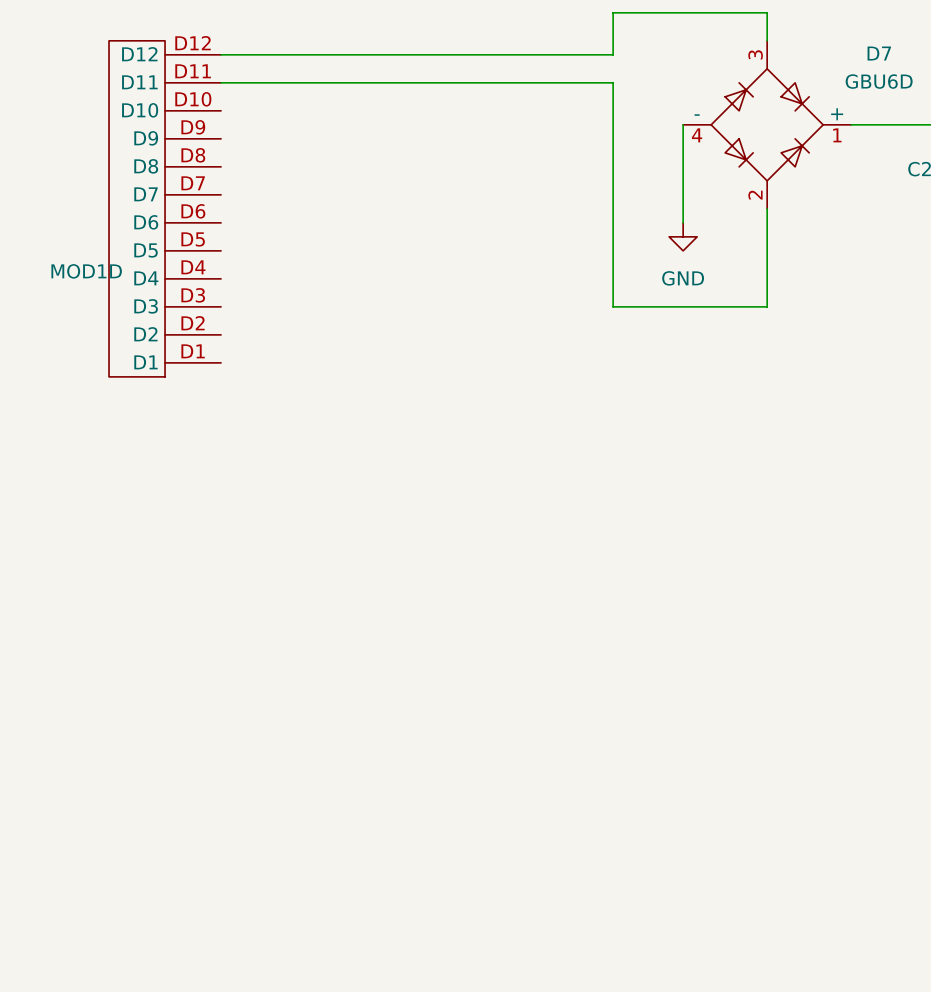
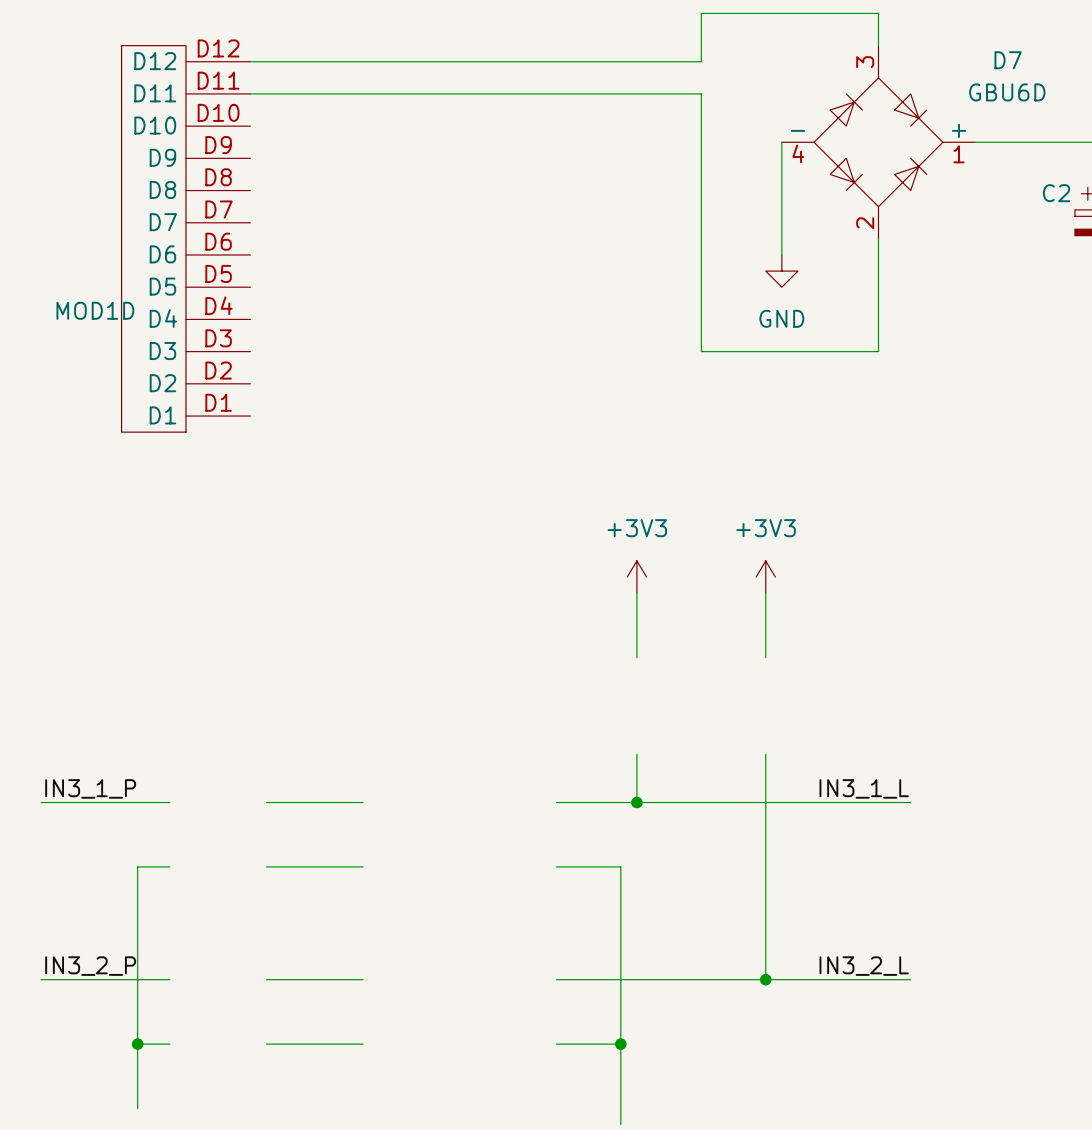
power symbol: none -> +3V3 (636, 577)
power symbol: none -> +3V3 (765, 577)
wire: none -> (636, 593) (636, 657)
wire: none -> (765, 593) (765, 657)
wire: none -> (636, 754) (636, 802)
wire: none -> (765, 754) (765, 979)
label: none -> IN3_1_P (90, 788)
label: none -> IN3_1_L (864, 788)
wire: none -> (41, 802) (169, 802)
wire: none -> (266, 802) (363, 802)
wire: none -> (556, 802) (910, 802)
junction: none -> (636, 802)
wire: none -> (169, 866) (137, 866) (137, 1108)
wire: none -> (266, 866) (363, 866)
wire: none -> (556, 866) (620, 866) (620, 1124)
label: none -> IN3_2_P (90, 966)
label: none -> IN3_2_L (864, 966)
wire: none -> (41, 979) (169, 979)
wire: none -> (266, 979) (363, 979)
wire: none -> (556, 979) (910, 979)
junction: none -> (765, 979)
wire: none -> (137, 1044) (169, 1044)
junction: none -> (137, 1044)
wire: none -> (266, 1044) (363, 1044)
wire: none -> (556, 1044) (620, 1044)
junction: none -> (620, 1044)

